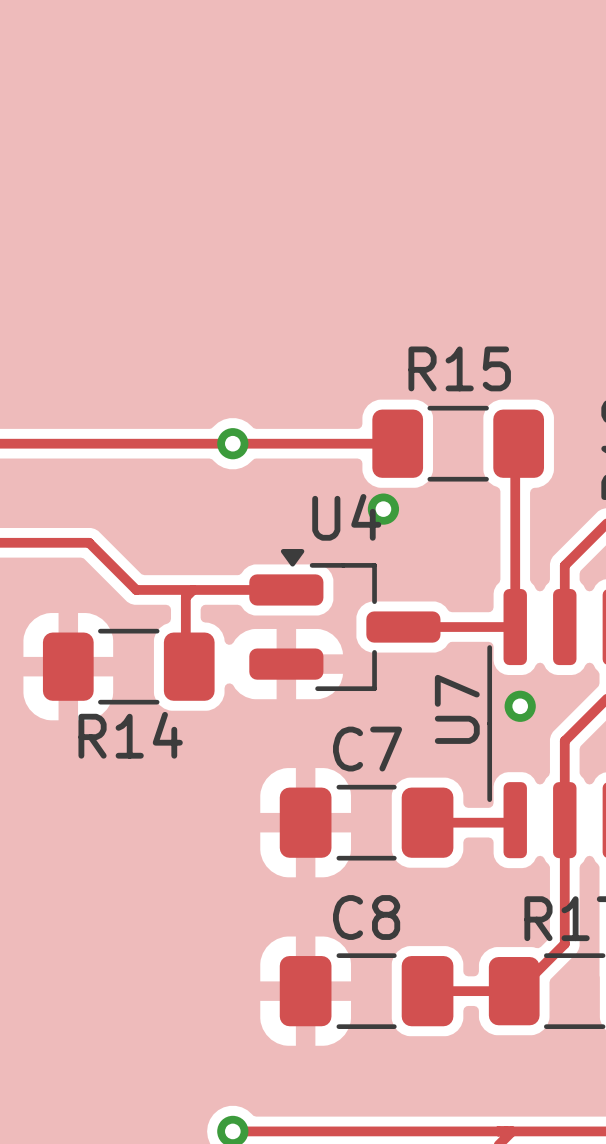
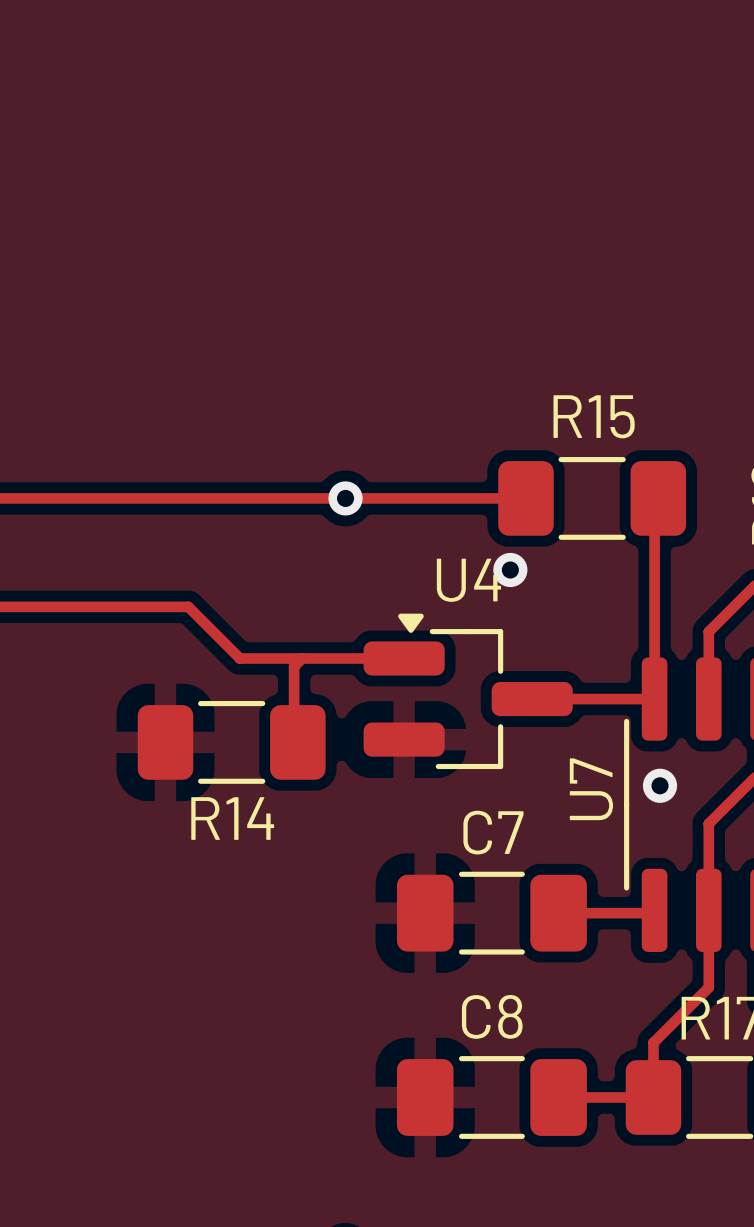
track: (564, 890) (564, 943) (517, 991) -> (708, 987) (653, 1042) (653, 1097)

